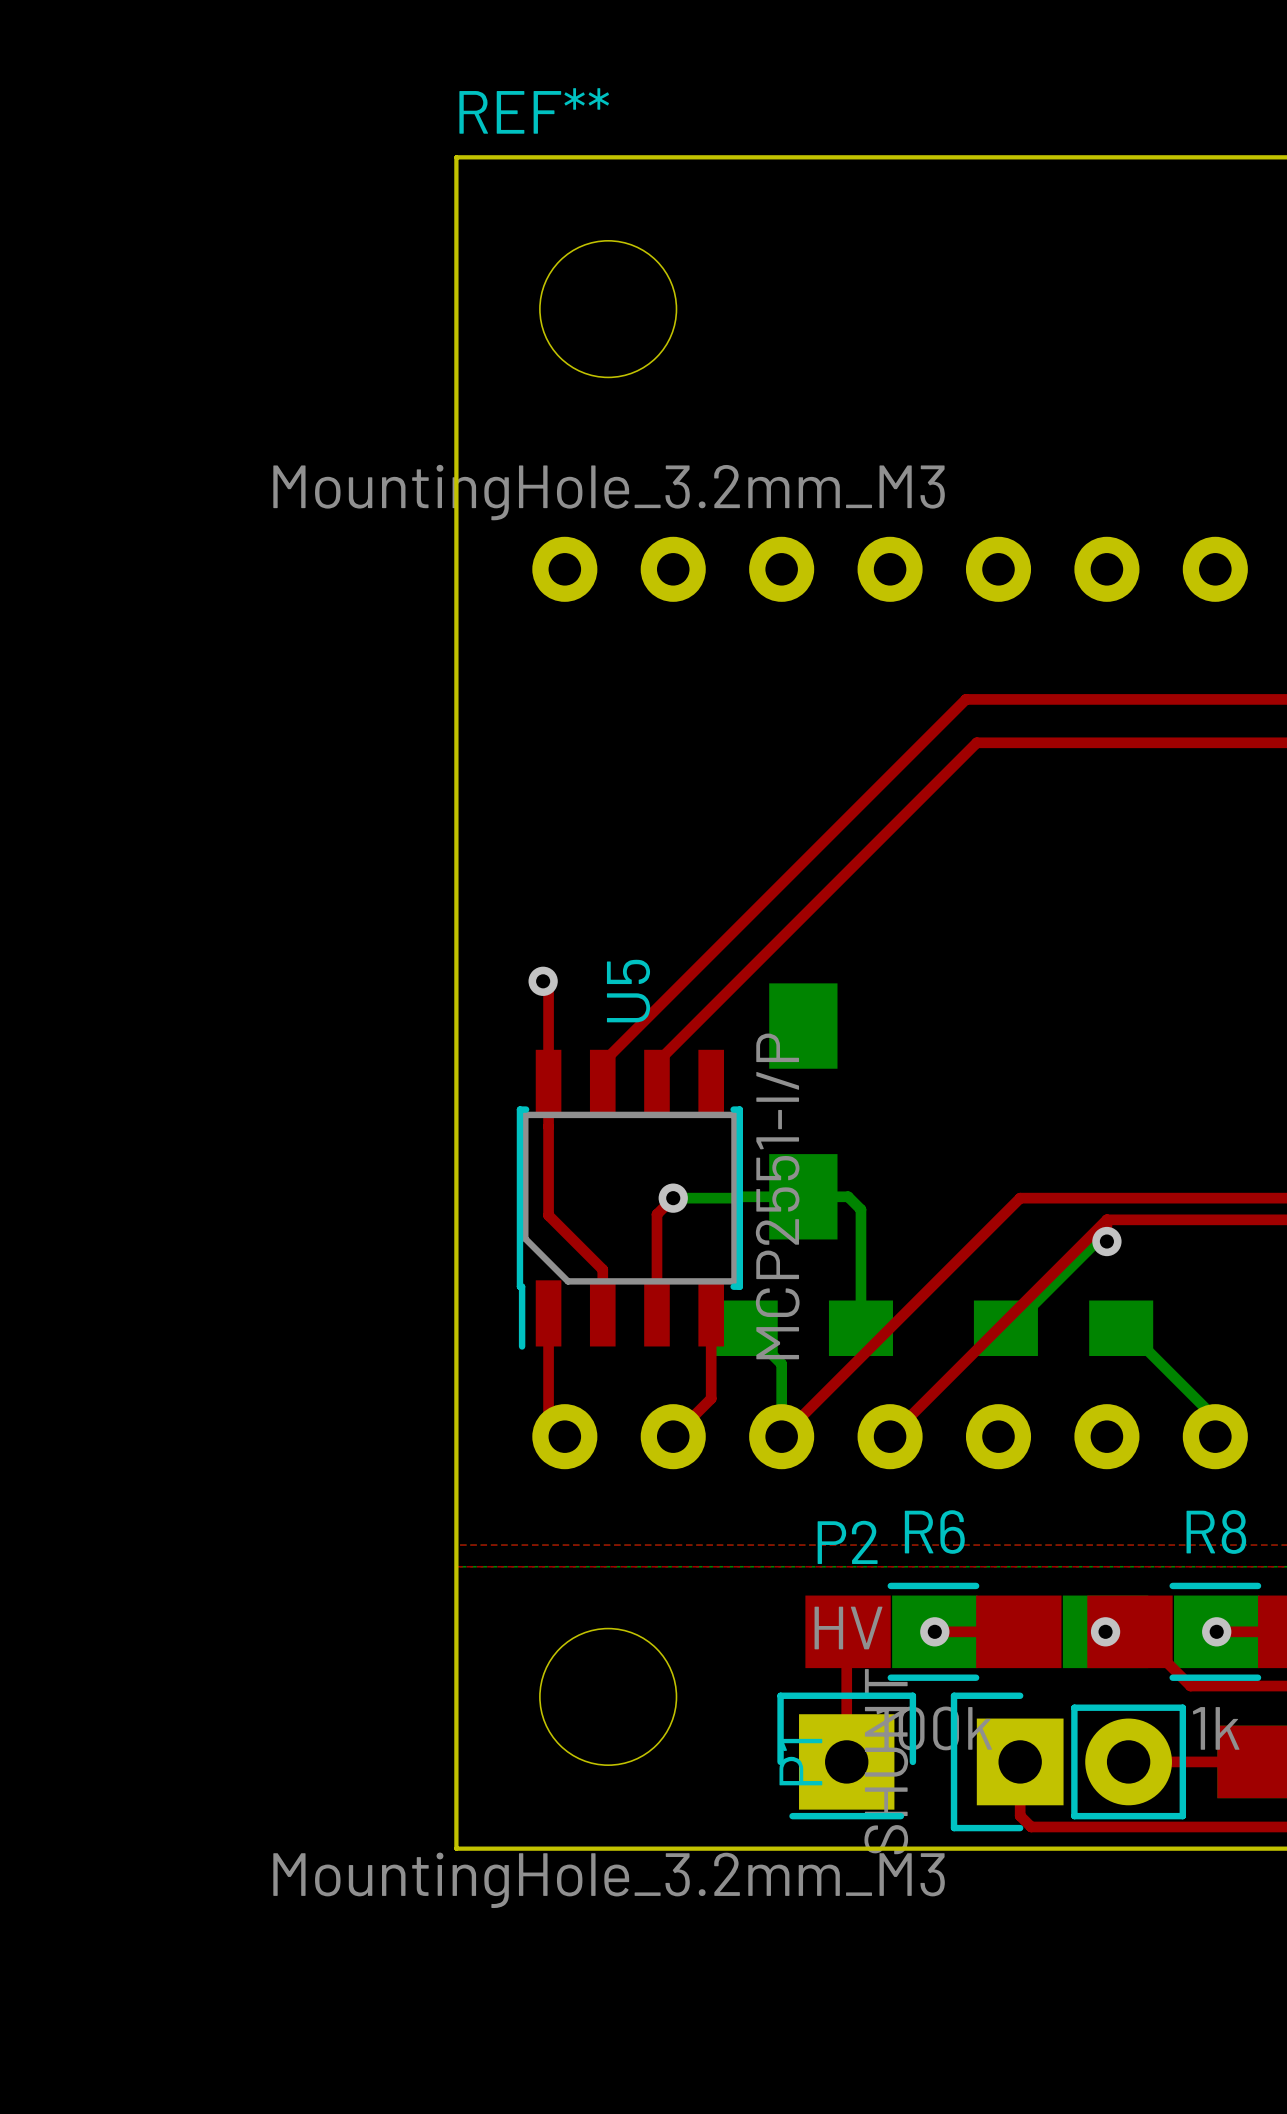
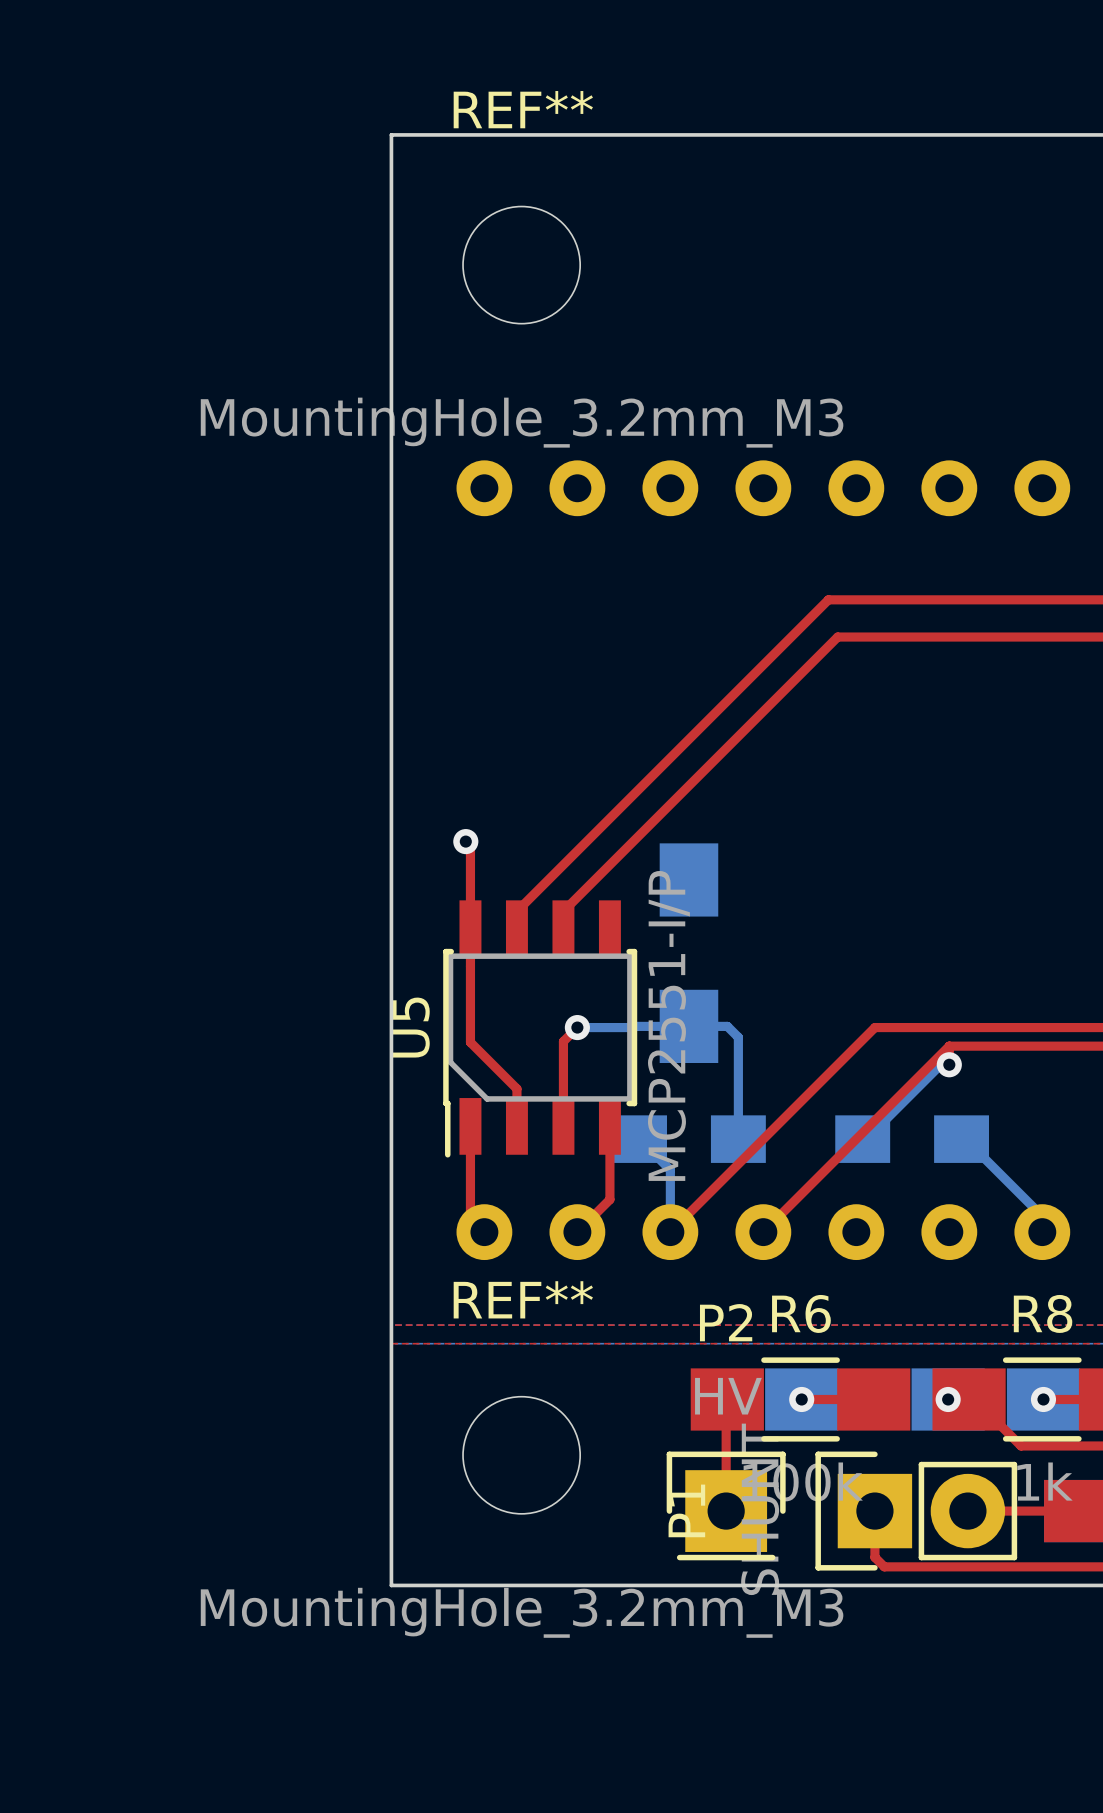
REF** name position: REF** (534, 110) -> REF** (523, 109)
U5 name position: U5 (628, 991) -> U5 (411, 1027)
REF** name: none -> REF** (523, 1299)

